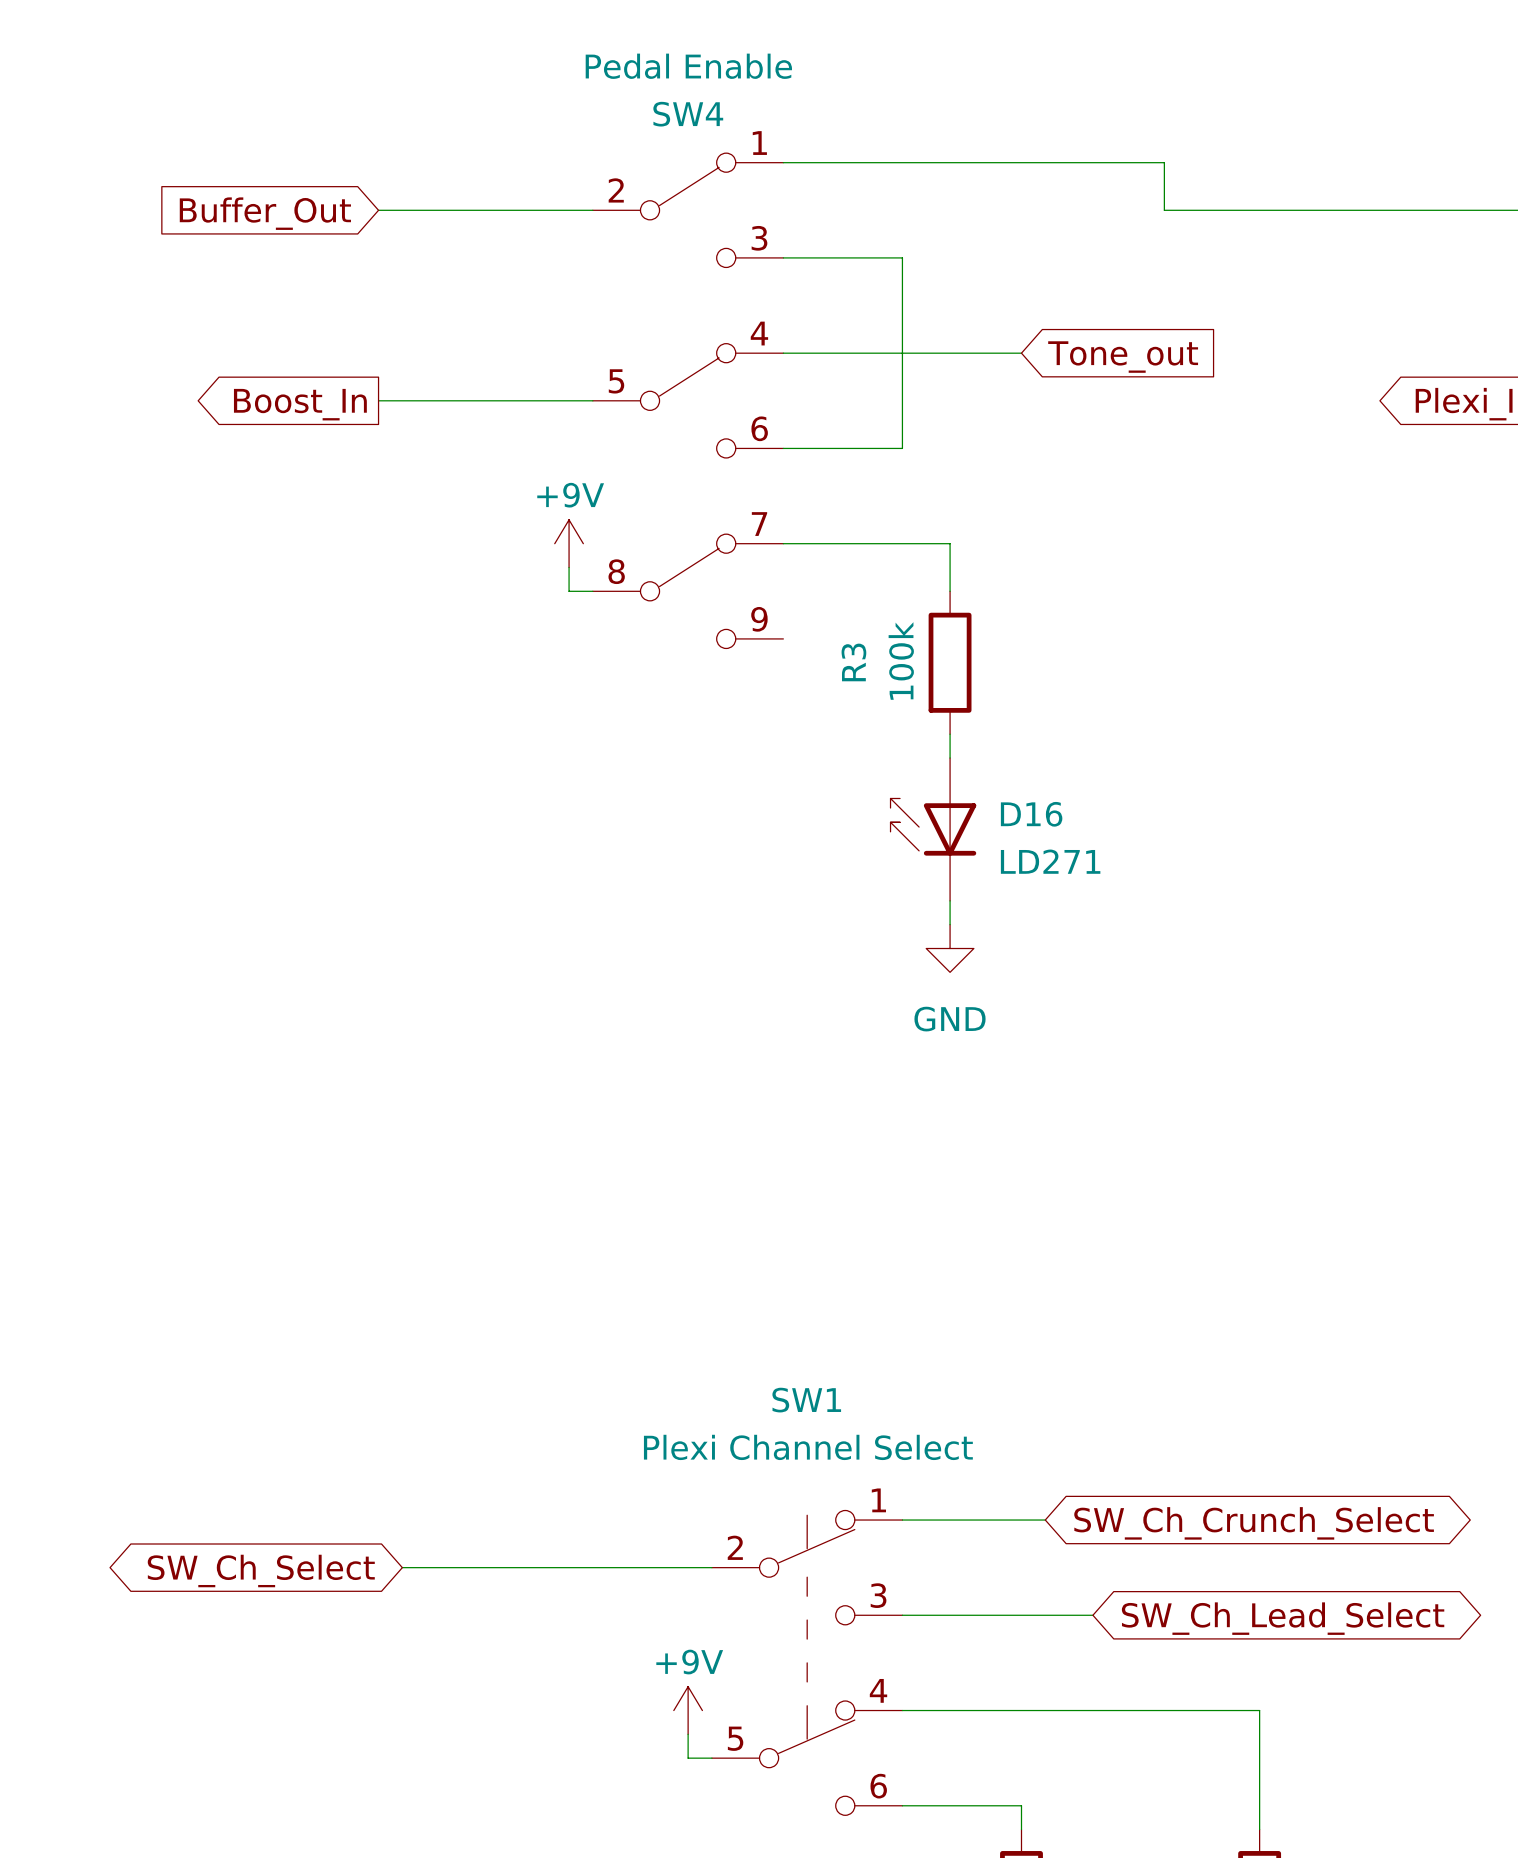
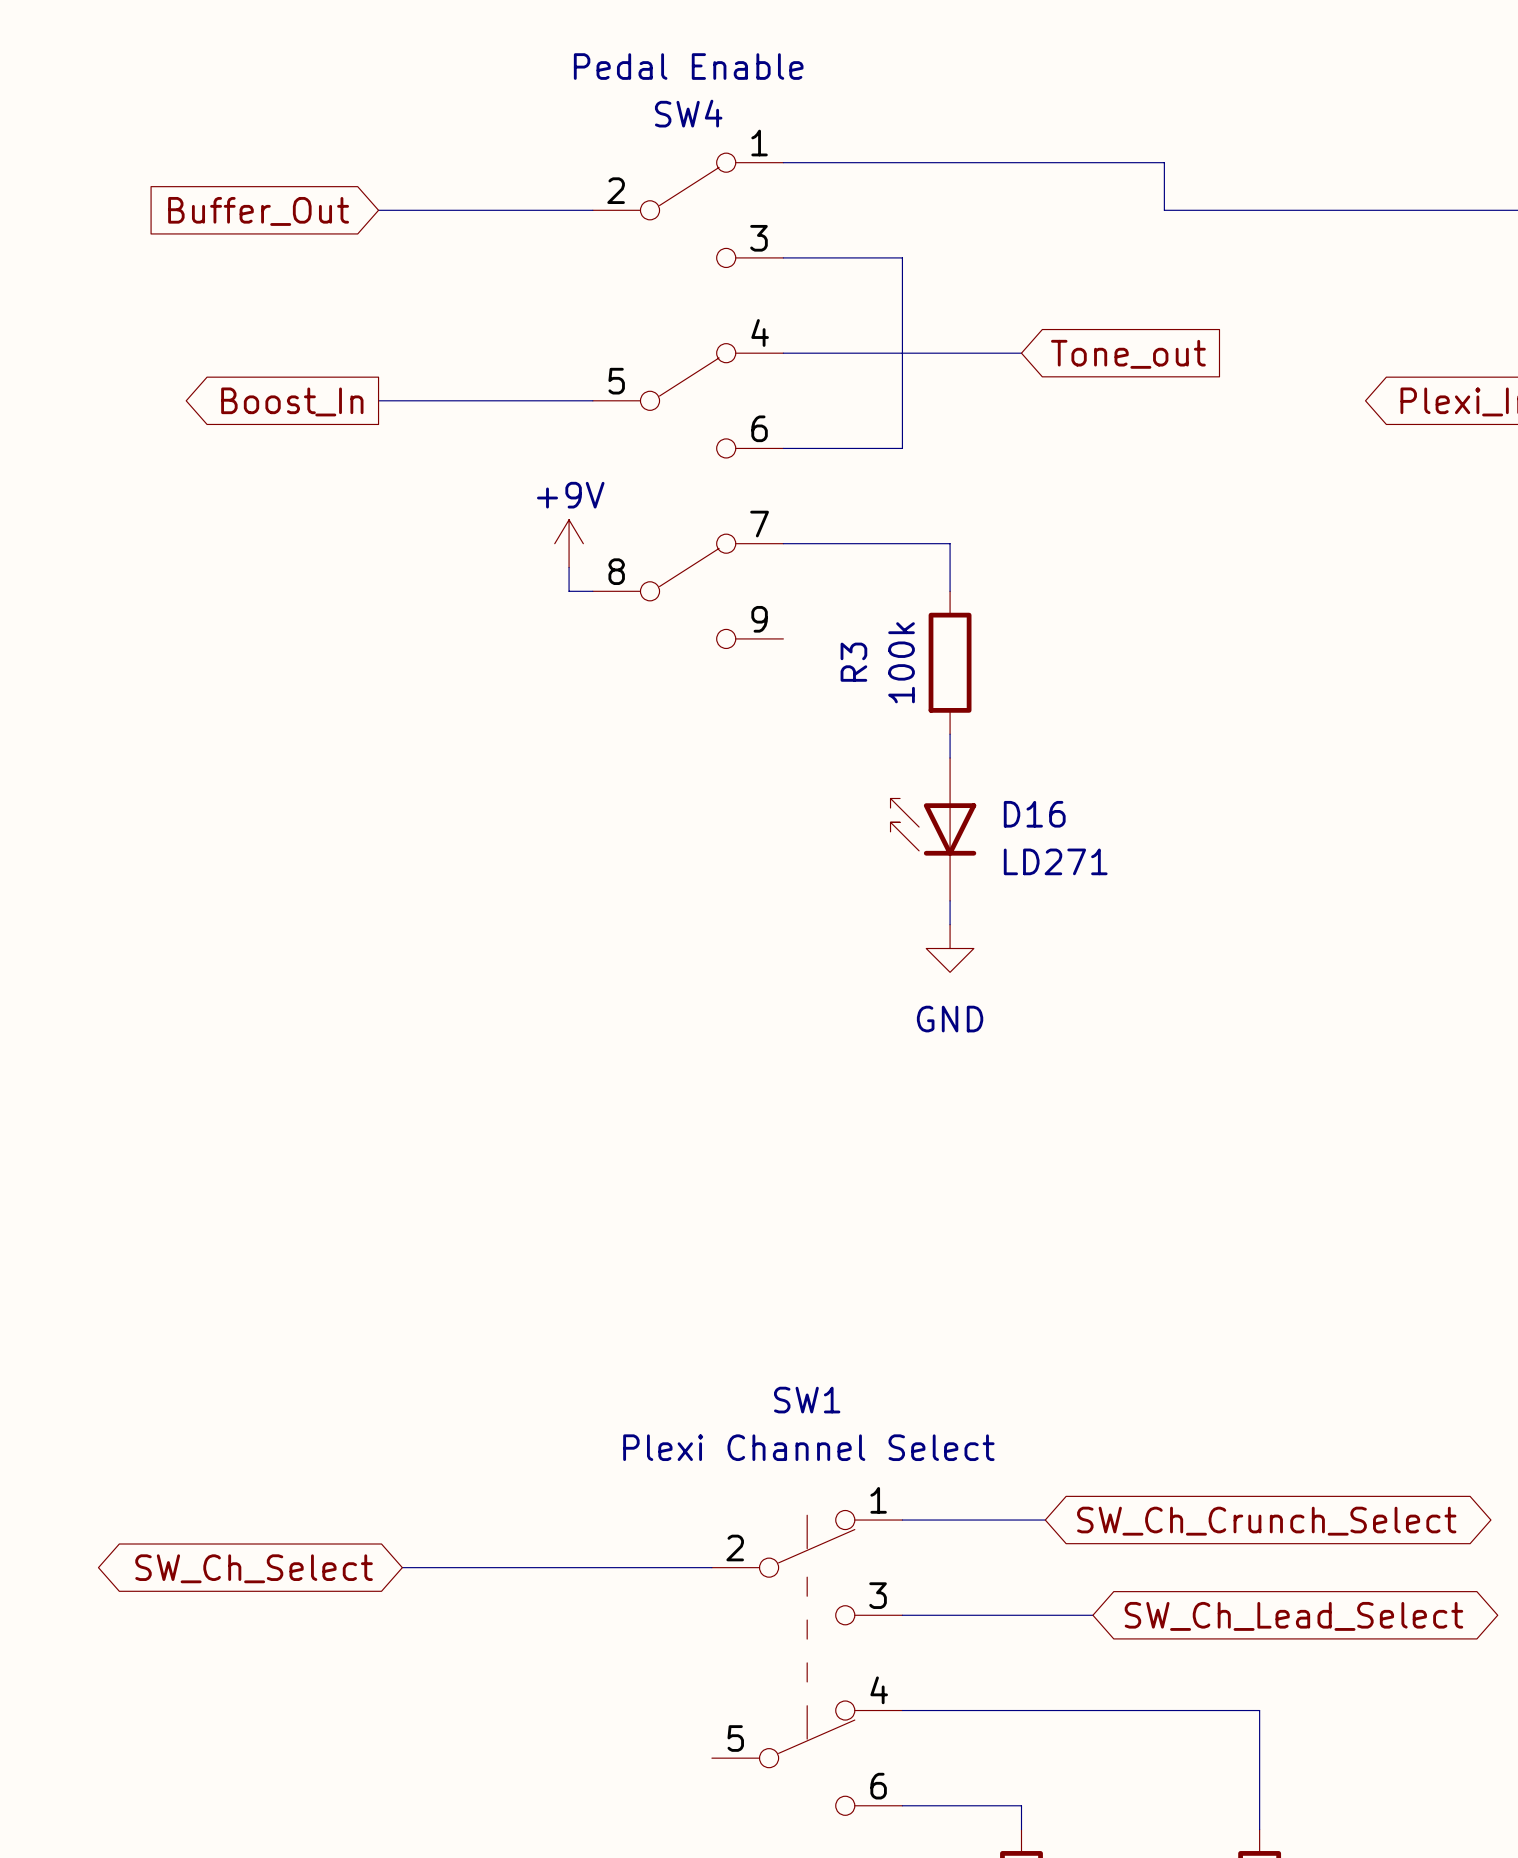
power symbol: +9V (688, 1710) -> none
wire: (688, 1734) (688, 1758) (711, 1758) -> none

